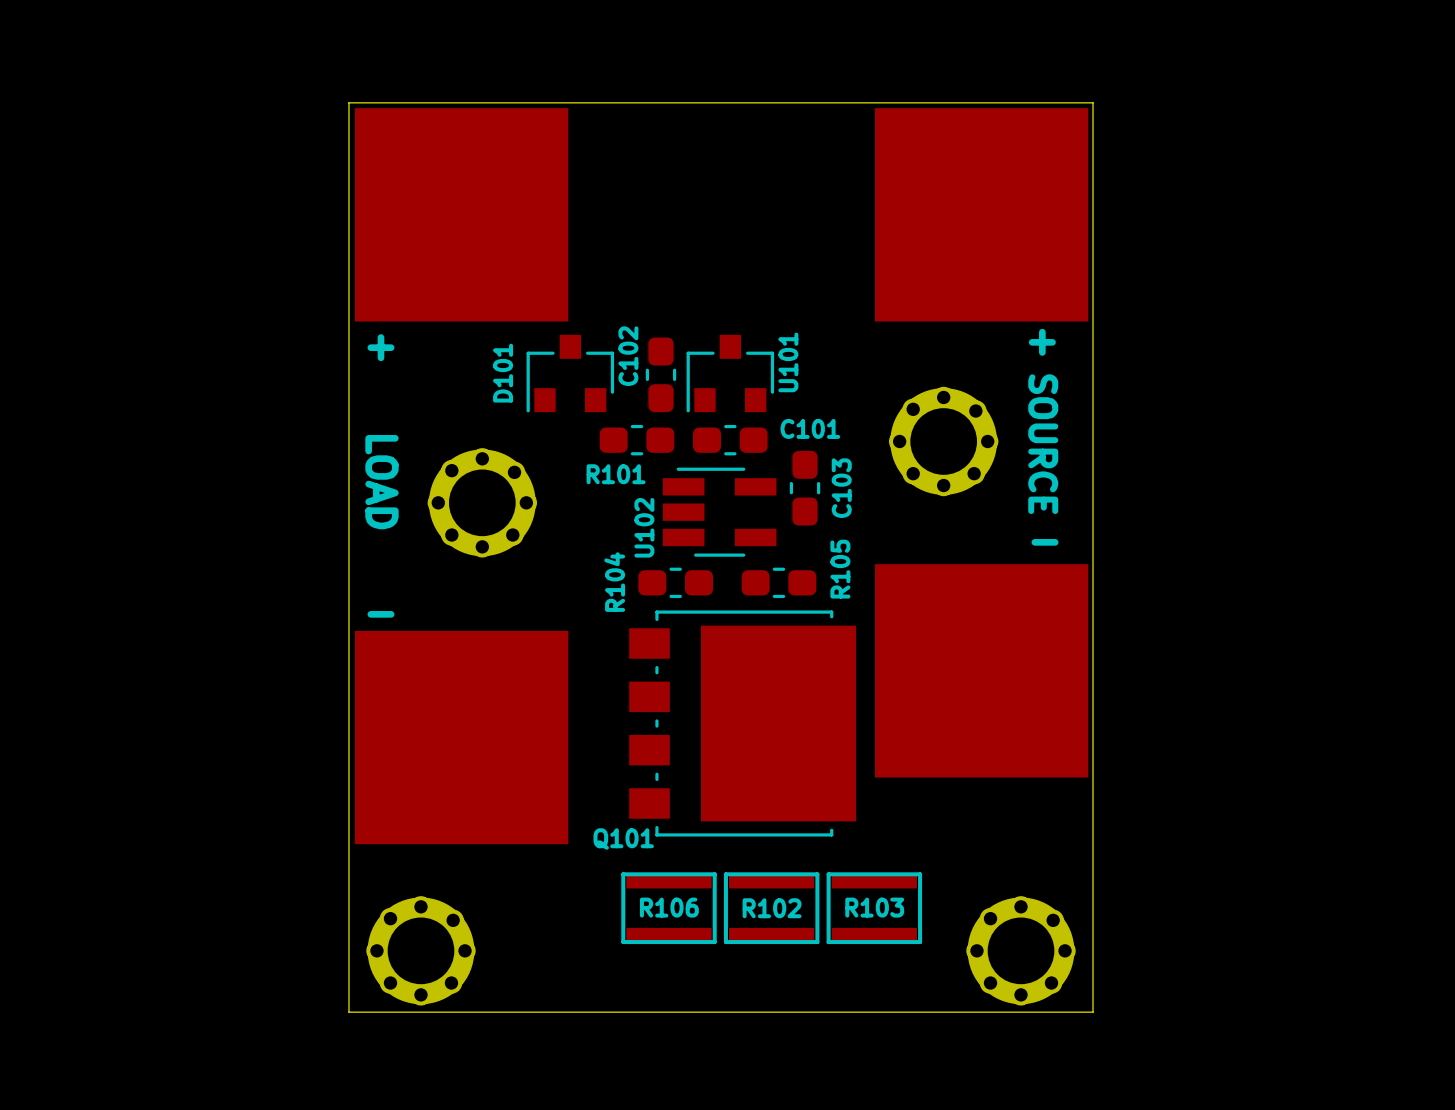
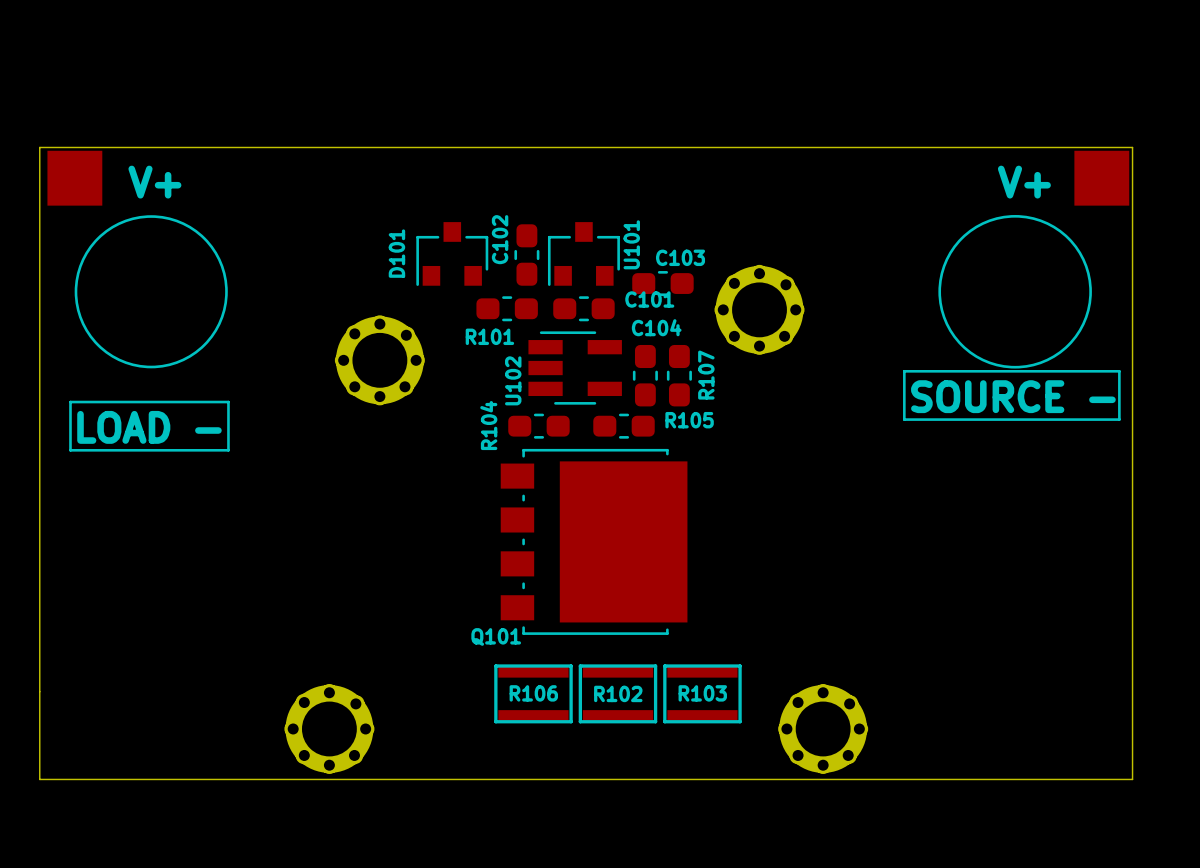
part: (461, 214) -> none
part: (981, 214) -> none
part: none -> (74, 178)
part: none -> (1101, 178)
text: none -> V+ (154, 182)
text: none -> V+ (1024, 182)
drawing: none -> [74, 215, 228, 369]
drawing: none -> [938, 215, 1092, 369]
text: + (1042, 342) -> none
text: + (380, 347) -> none
text: SOURCE (1043, 444) -> none
text: LOAD (381, 482) -> none
C103 rotation: 0° (805, 488) -> 90° clockwise (662, 283)
C103 position: (805, 488) -> (662, 283)
line: none -> (904, 371) (904, 419) (1119, 419) (1119, 371) (904, 371)
C104: none -> (645, 375)
R107: none -> (679, 375)
text: - (1045, 542) -> none
text: none -> SOURCE - (1013, 396)
line: none -> (70, 402) (228, 402) (228, 450) (70, 450) (70, 402)
R105 name rotation: 0° (840, 569) -> 90° clockwise (689, 420)
text: none -> LOAD - (149, 427)
text: - (380, 614) -> none
part: (981, 670) -> none
part: (461, 737) -> none
board edge: (348, 1012) (348, 102) (1093, 102) (1093, 1012) -> (270, 779) (39, 779) (39, 147) (1132, 147) (1132, 779) (882, 779)

